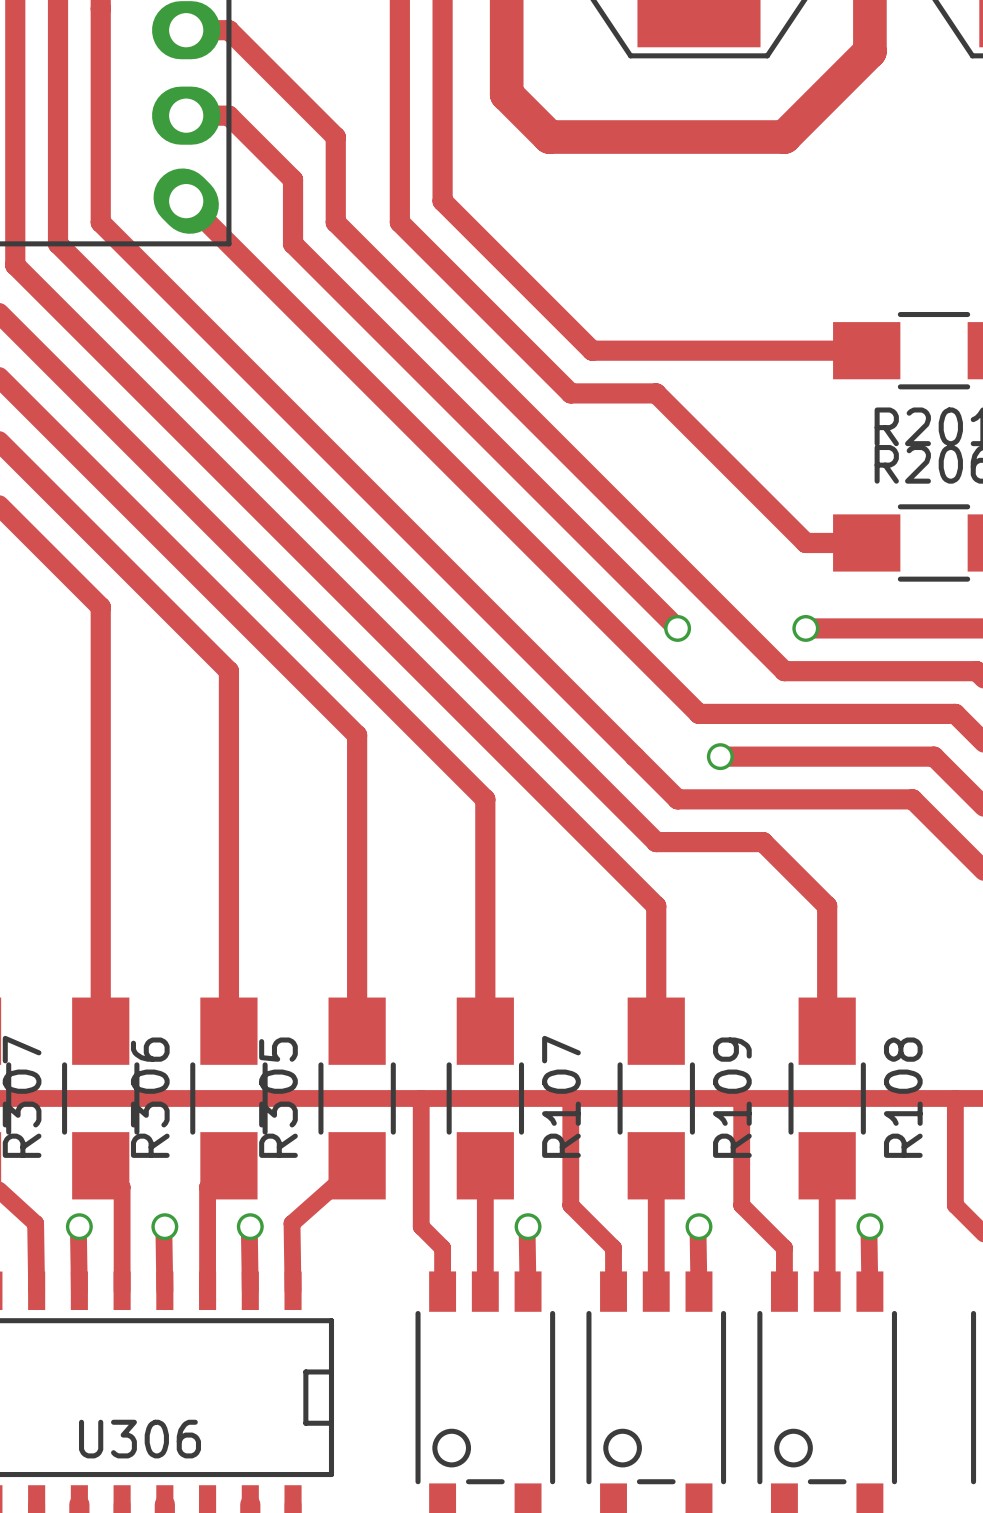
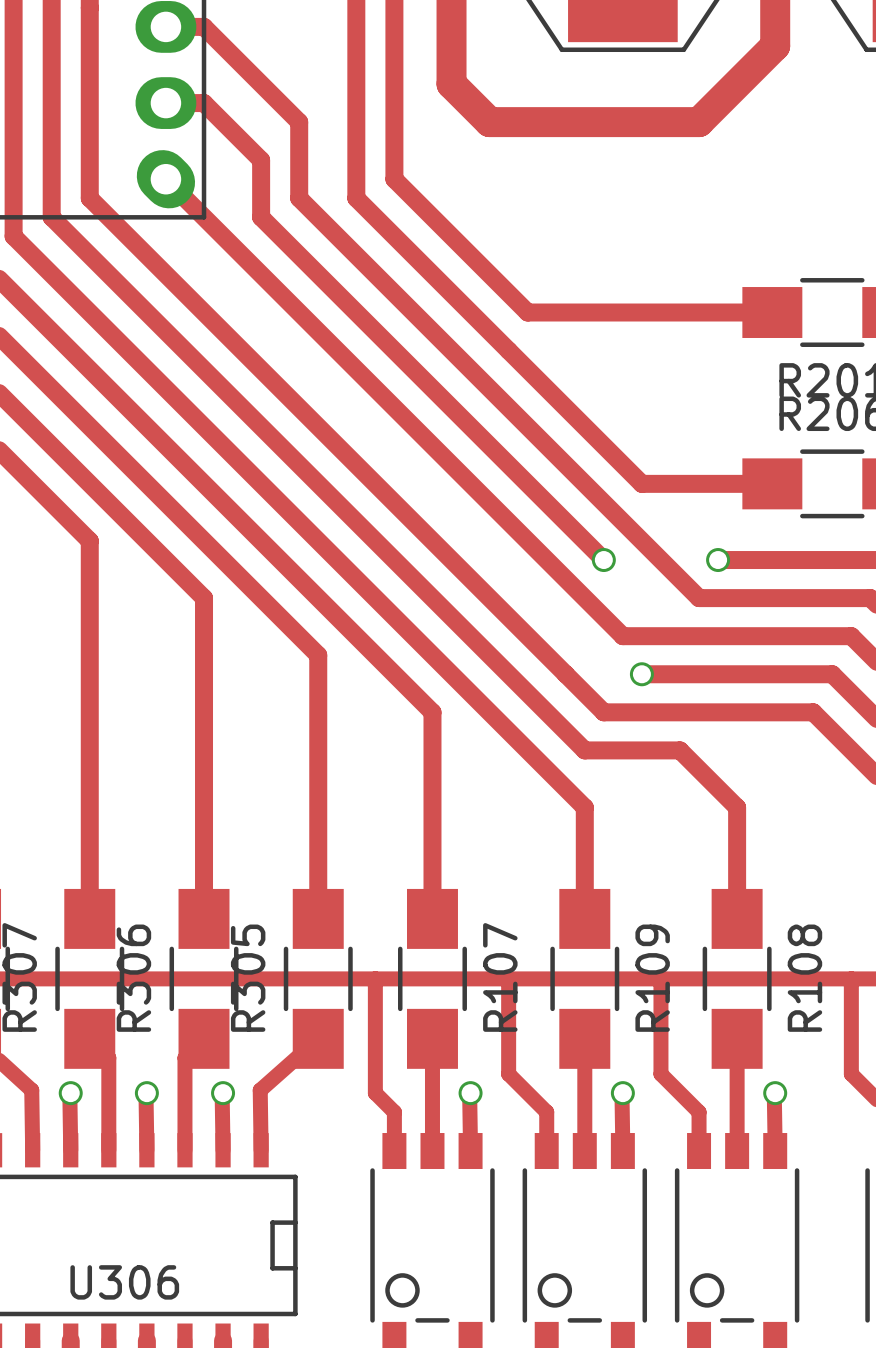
track: (570, 393) (656, 393) (805, 542) -> (508, 350) (641, 483) (718, 483)

